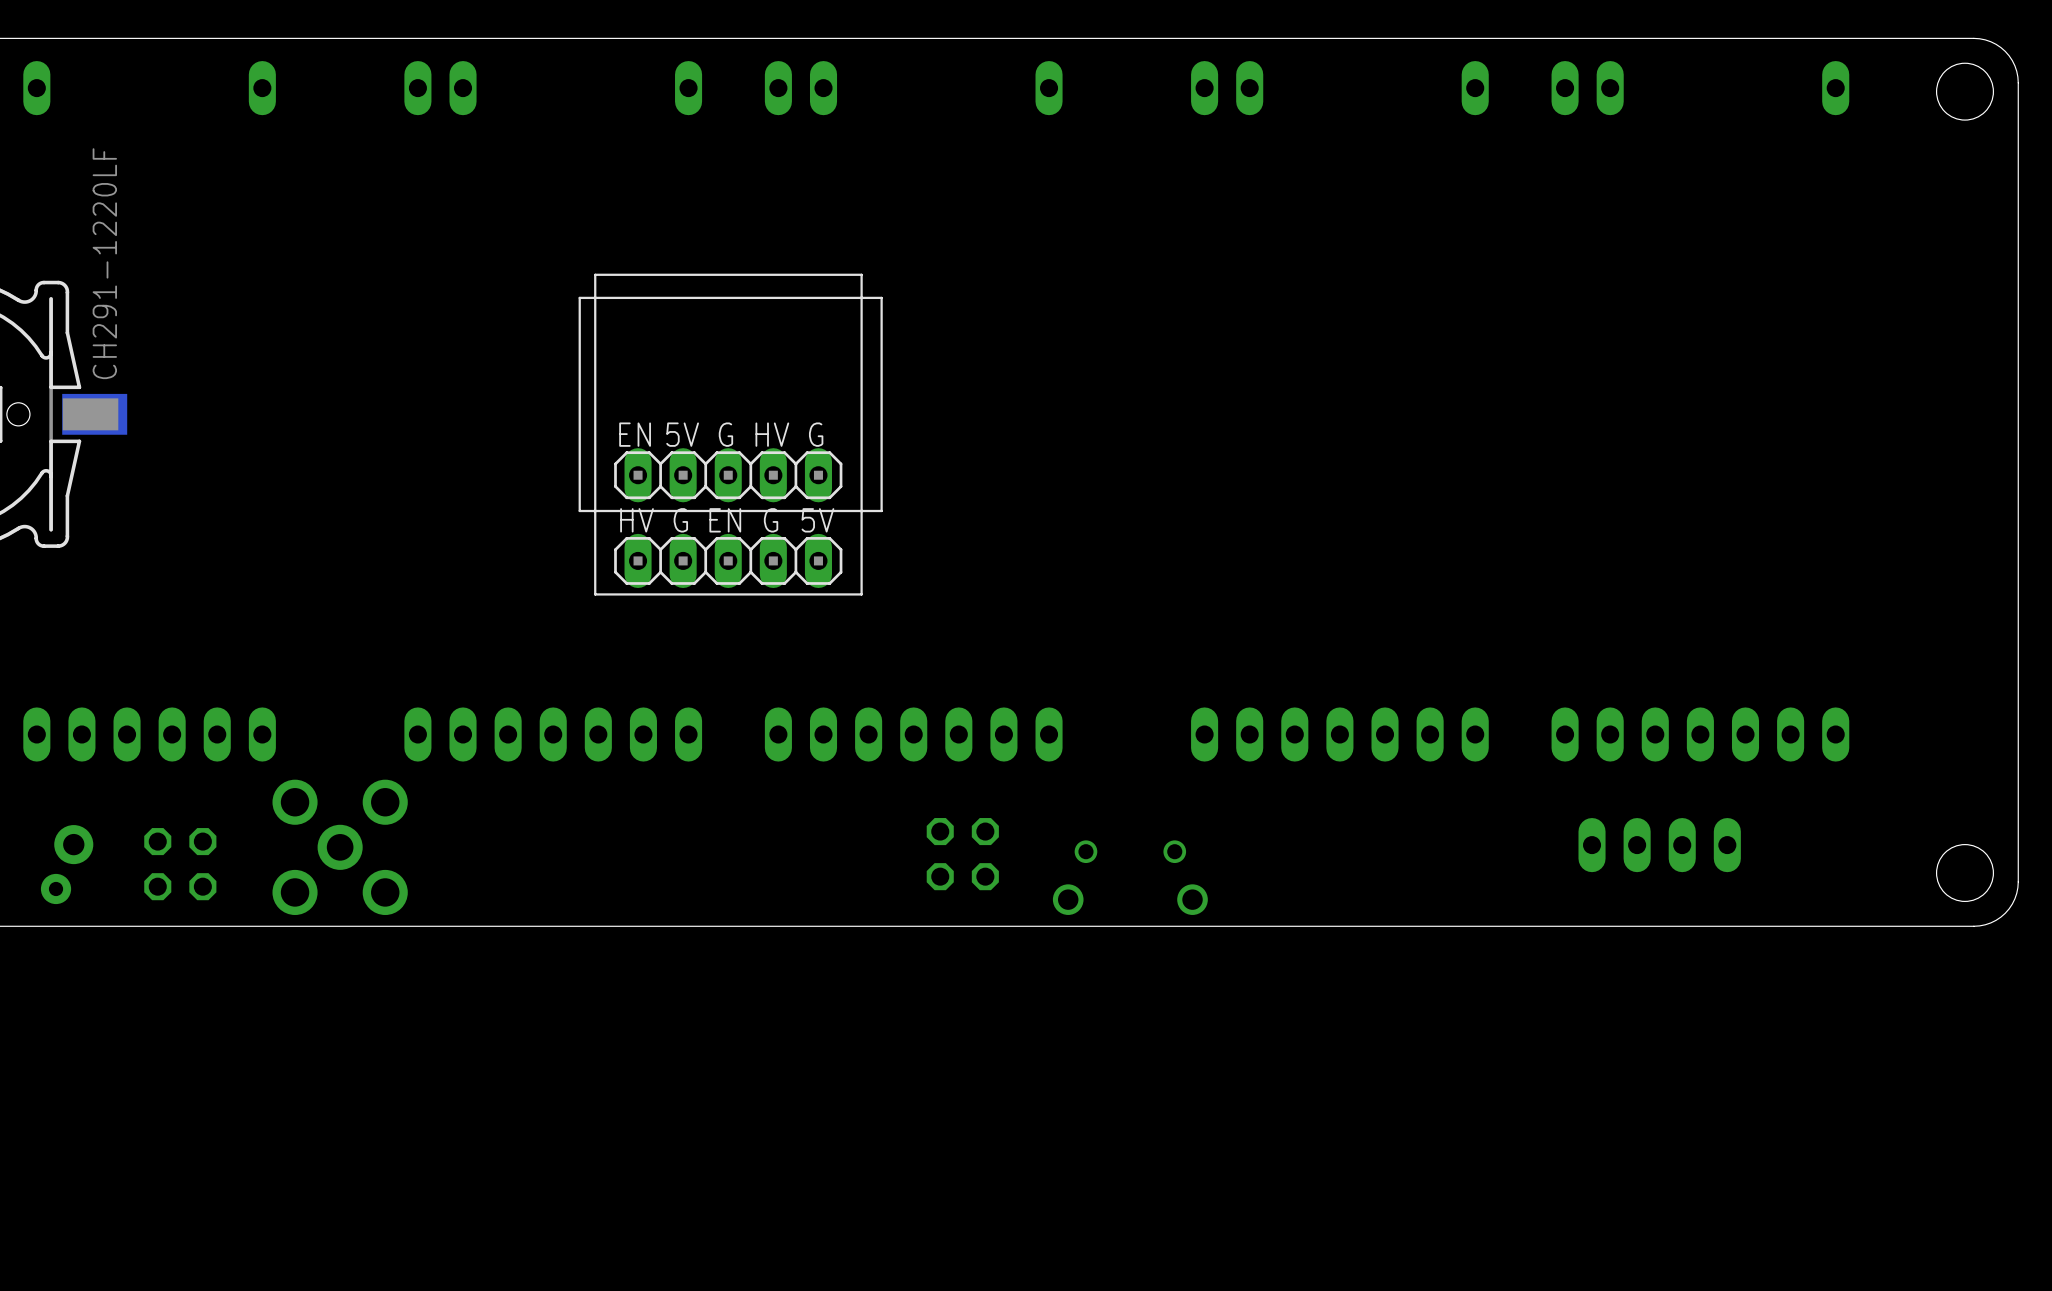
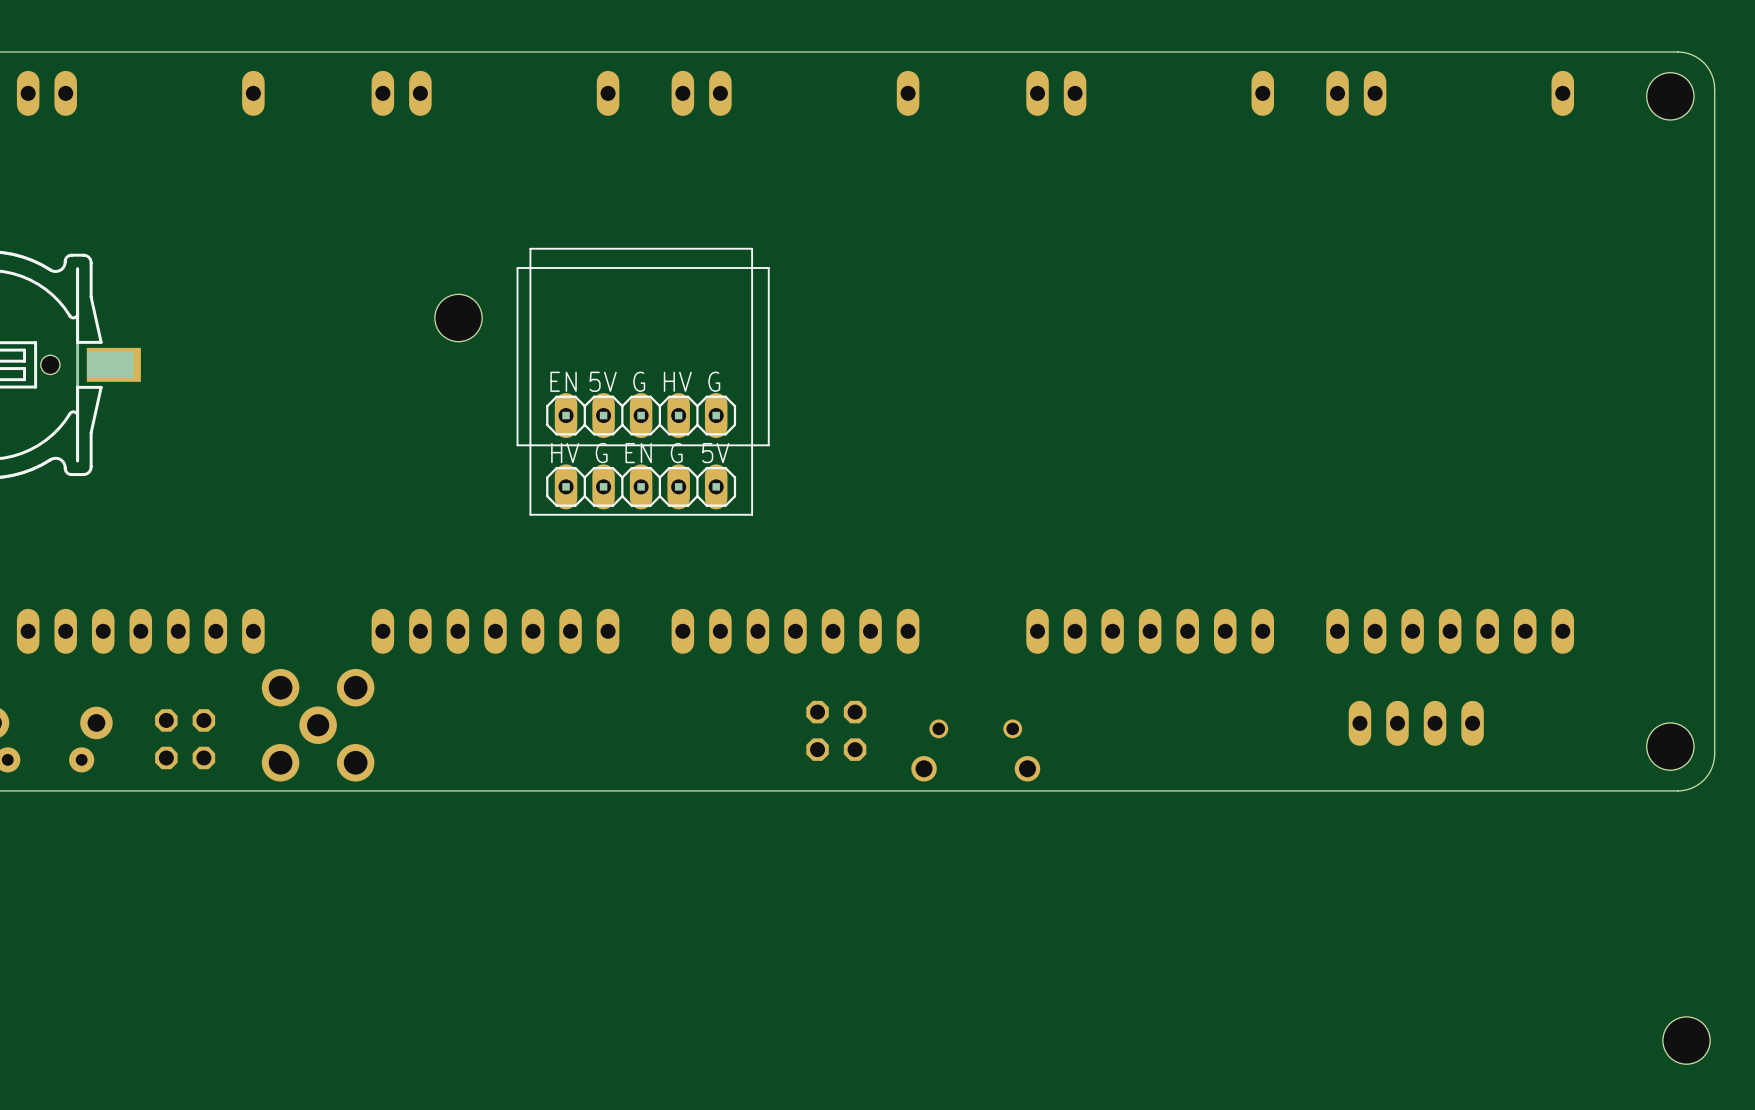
part value: CH291-1220LF (104, 263) -> none
part: none -> (458, 318)
part: none -> (1686, 1040)

